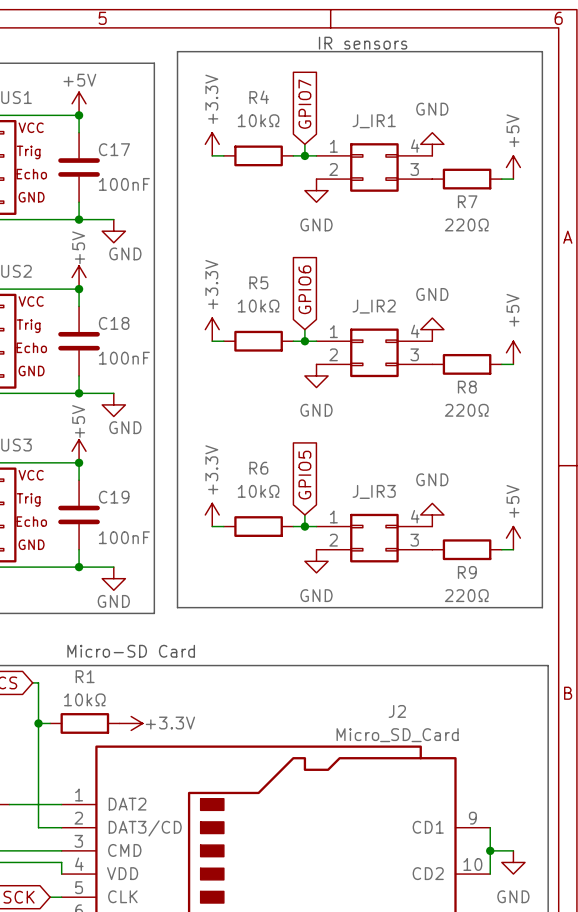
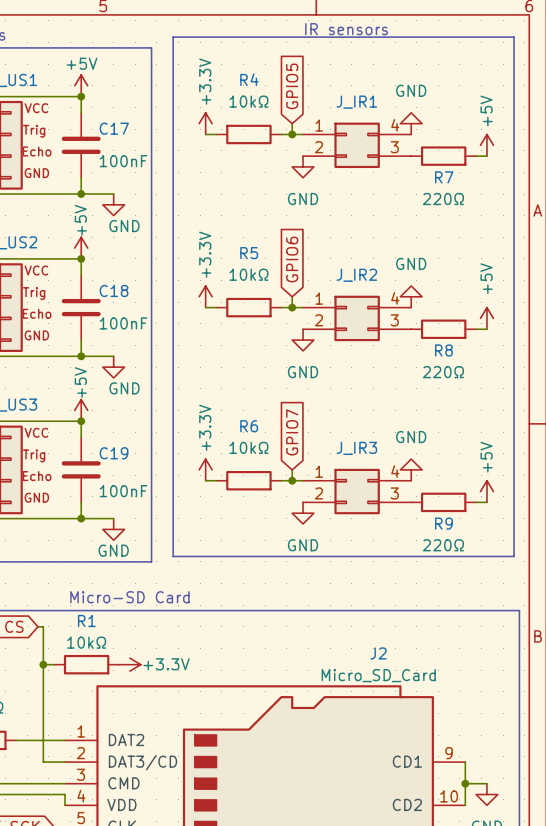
global label: GPIO7 (304, 104) -> GPIO5 (292, 86)
global label: GPIO5 (304, 475) -> GPIO7 (292, 432)

